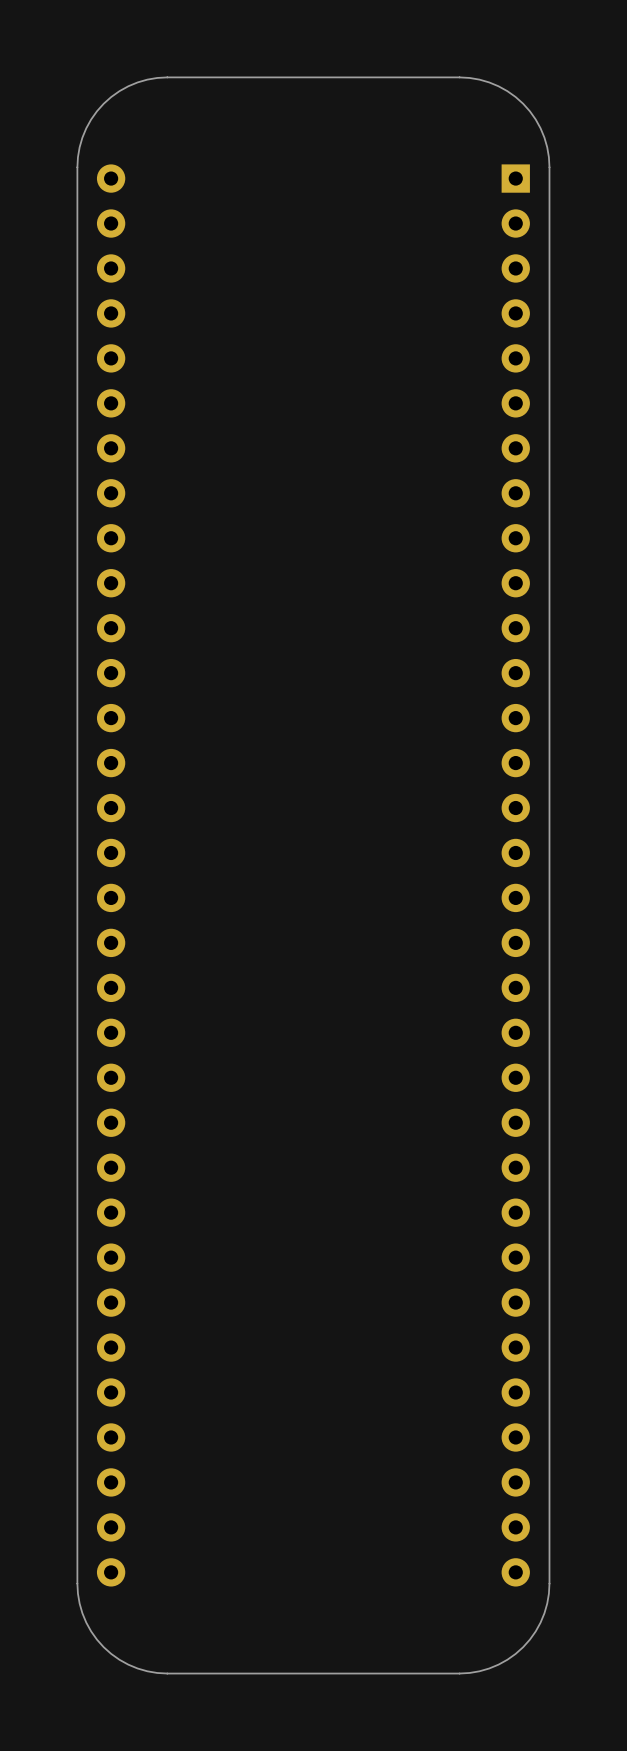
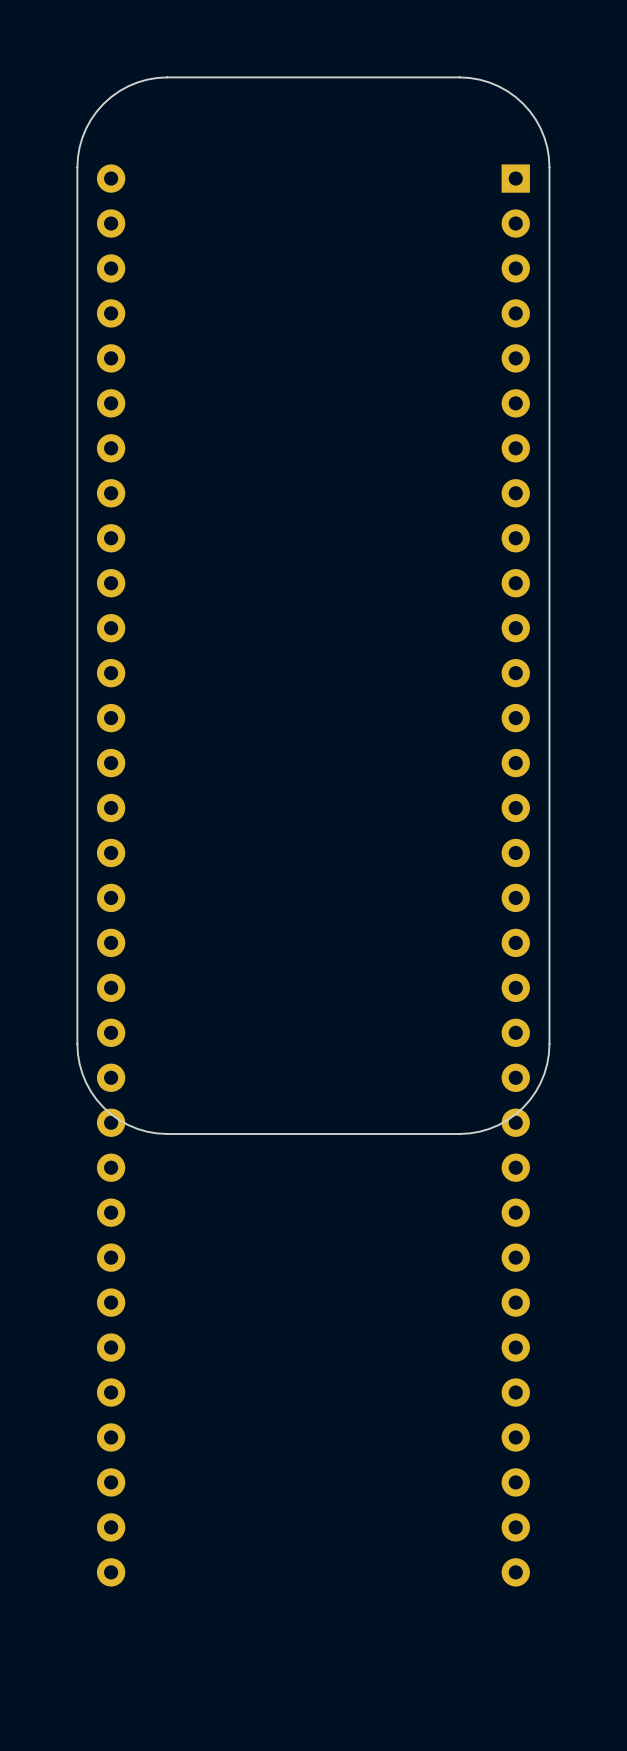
board edge: (549, 1044) (548, 1593) (540, 1622) (529, 1639) (515, 1653) (489, 1668) (459, 1673) (157, 1672) (137, 1668) (119, 1659) (103, 1647) (91, 1631) (82, 1613) (77, 1583) (77, 1044) -> (549, 1044) (547, 1064) (540, 1083) (523, 1107) (507, 1120) (489, 1128) (459, 1133) (167, 1133) (147, 1131) (119, 1120) (97, 1100) (82, 1073) (77, 1044)

